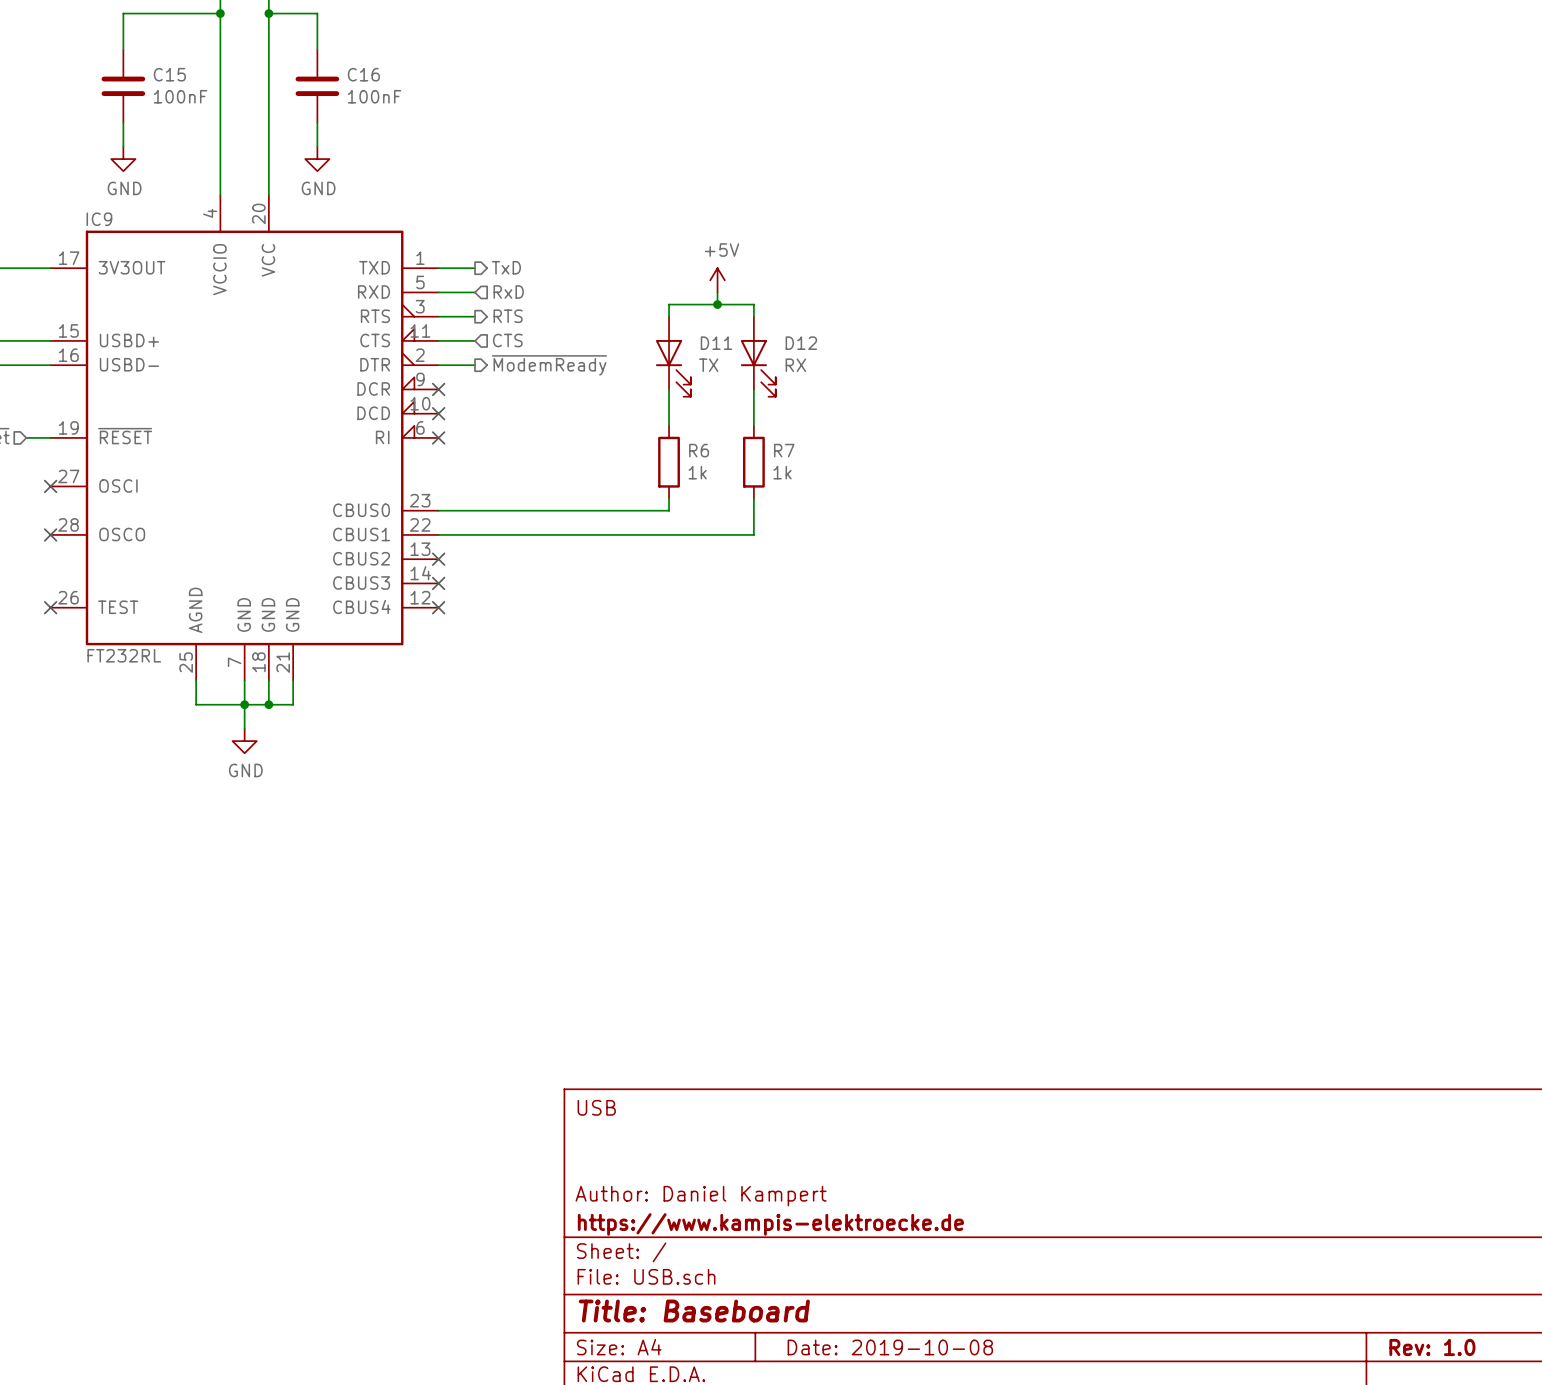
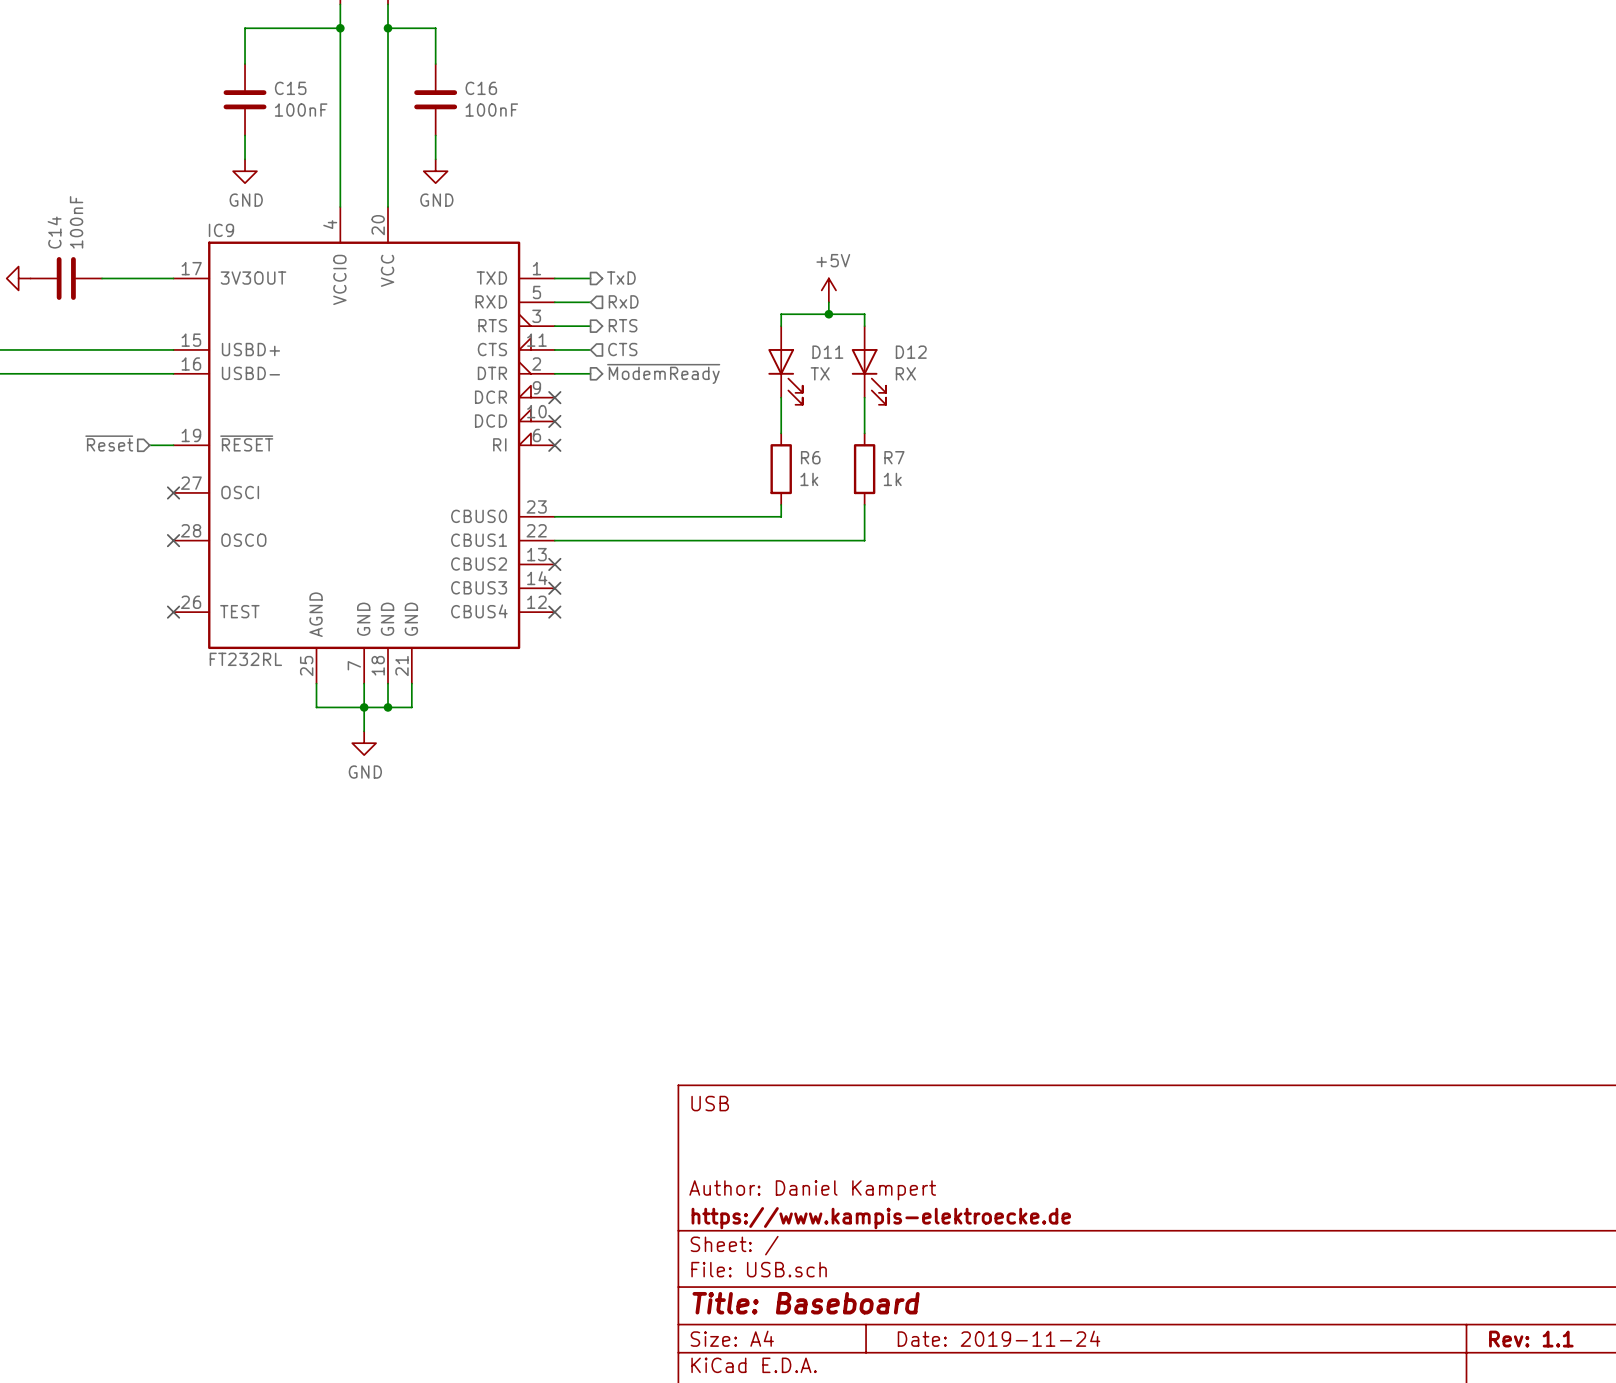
title block: Date: 2019-10-08 (890, 1347) -> Date: 2019-11-24 (999, 1338)
title block: Rev: 1.0 (1432, 1347) -> Rev: 1.1 (1531, 1339)

